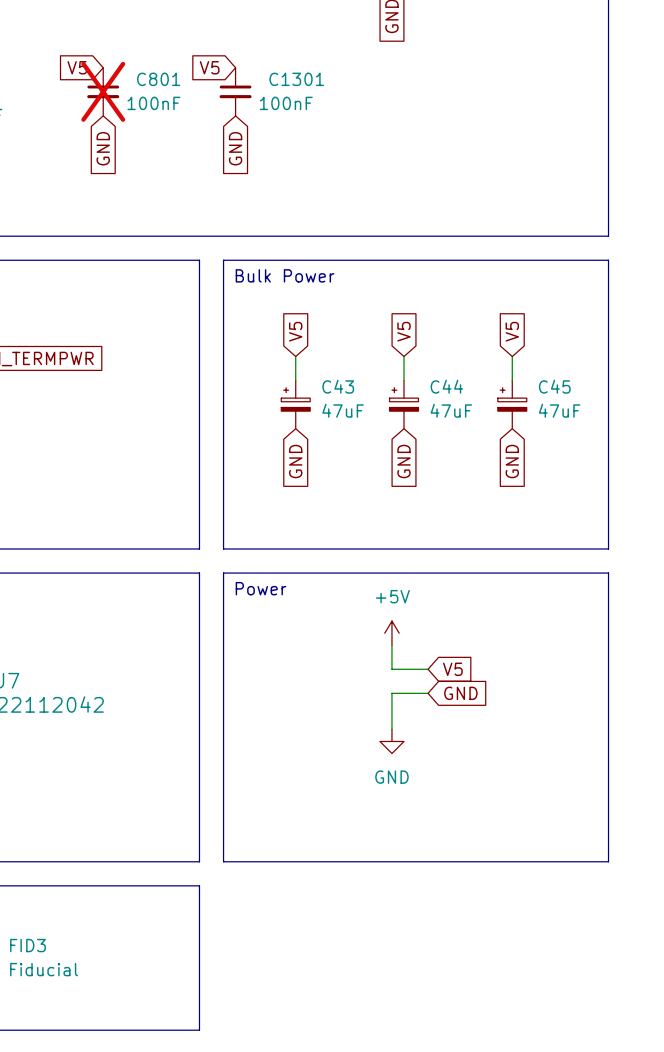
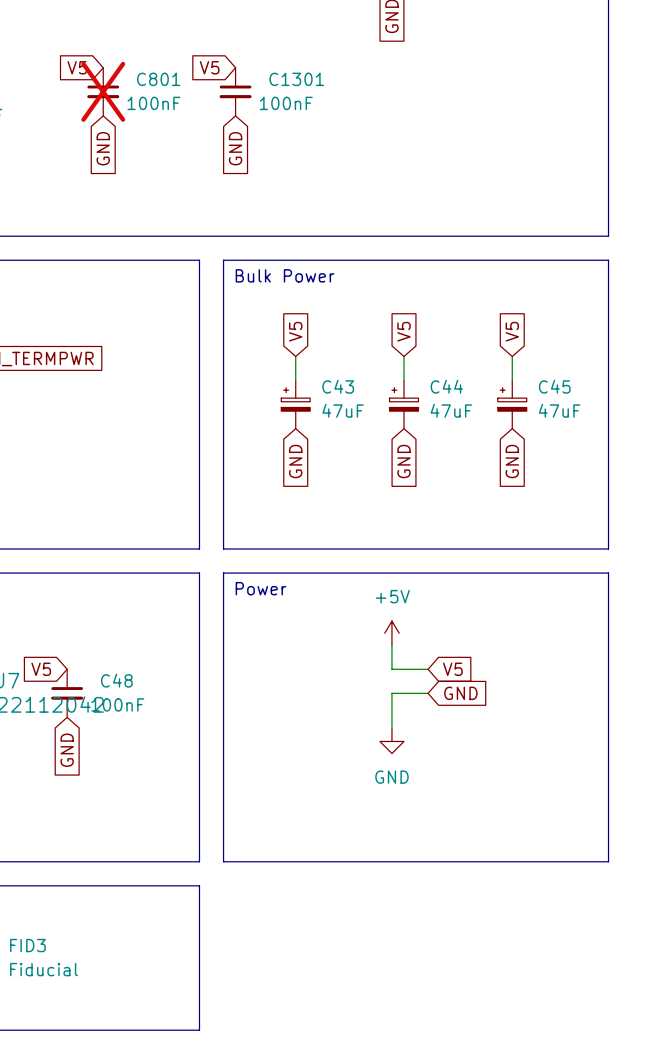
global label: none -> V5 (41, 669)
C48: none -> 100nF (67, 693)
global label: none -> GND (67, 750)

